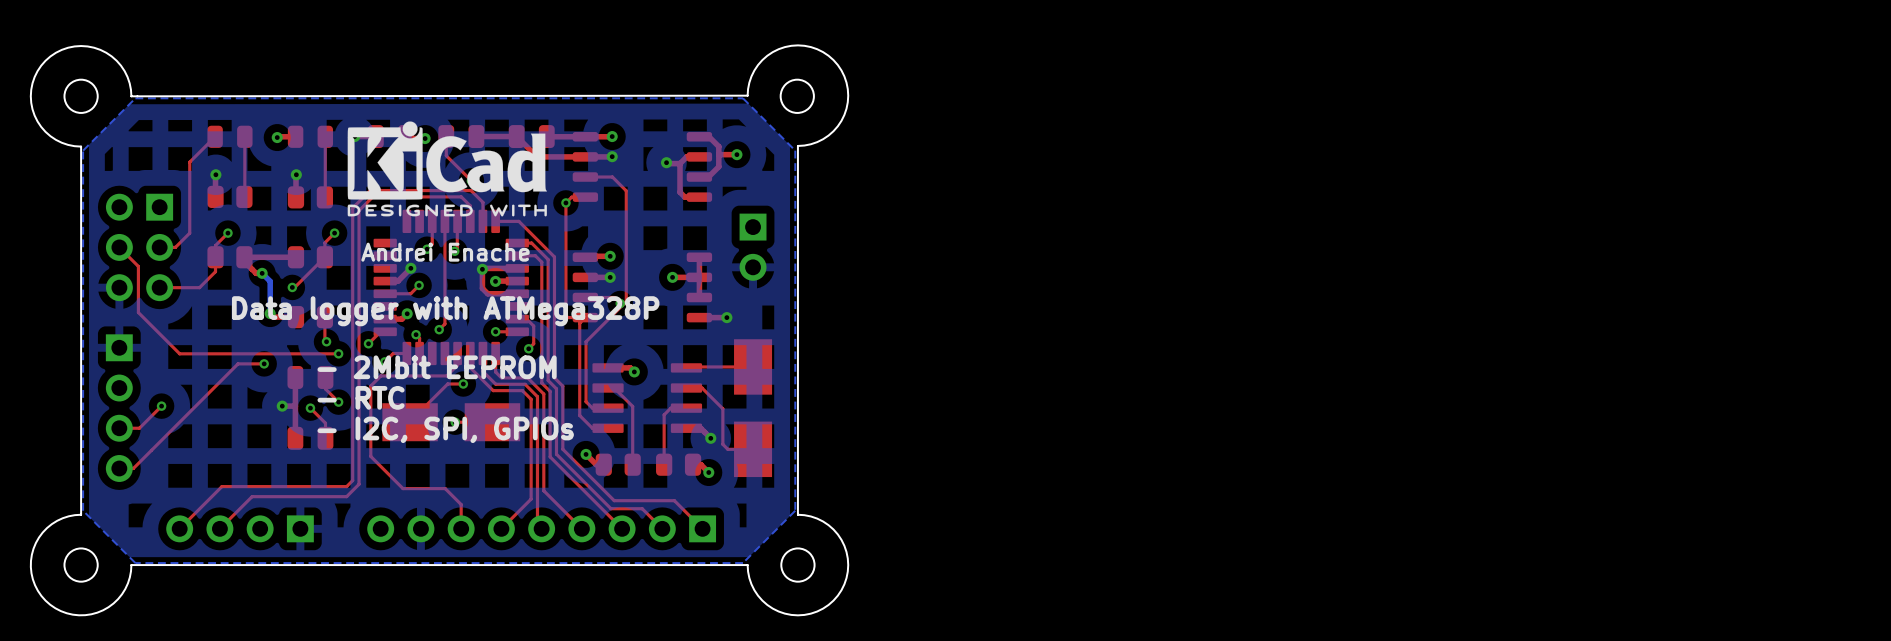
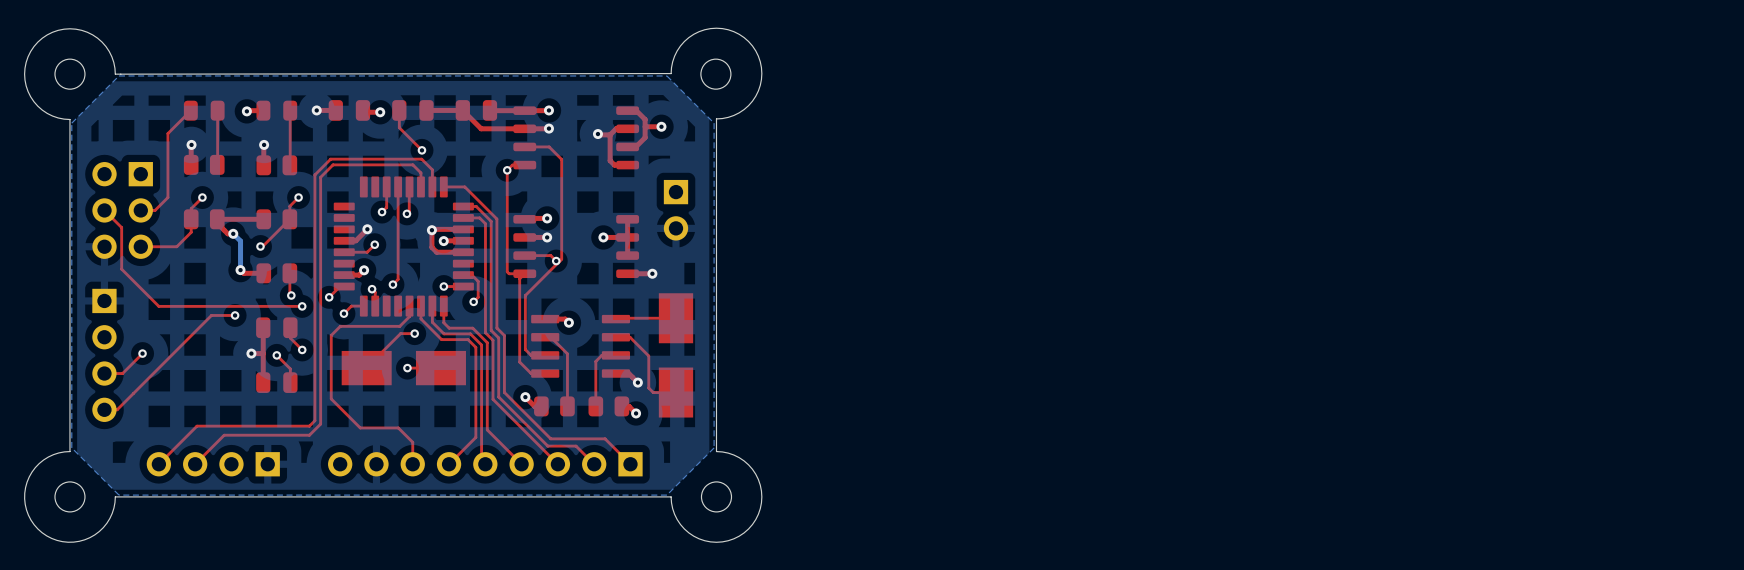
drawing: [347, 121, 547, 217] -> none
text: Andrei Enache (445, 252) -> none
text: Data logger with ATMega328P (445, 311) -> none
text: - 2Mbit EEPROM (437, 367) -> none
text: - RTC (361, 397) -> none
text: - I2C, SPI, GPIOs (445, 429) -> none

